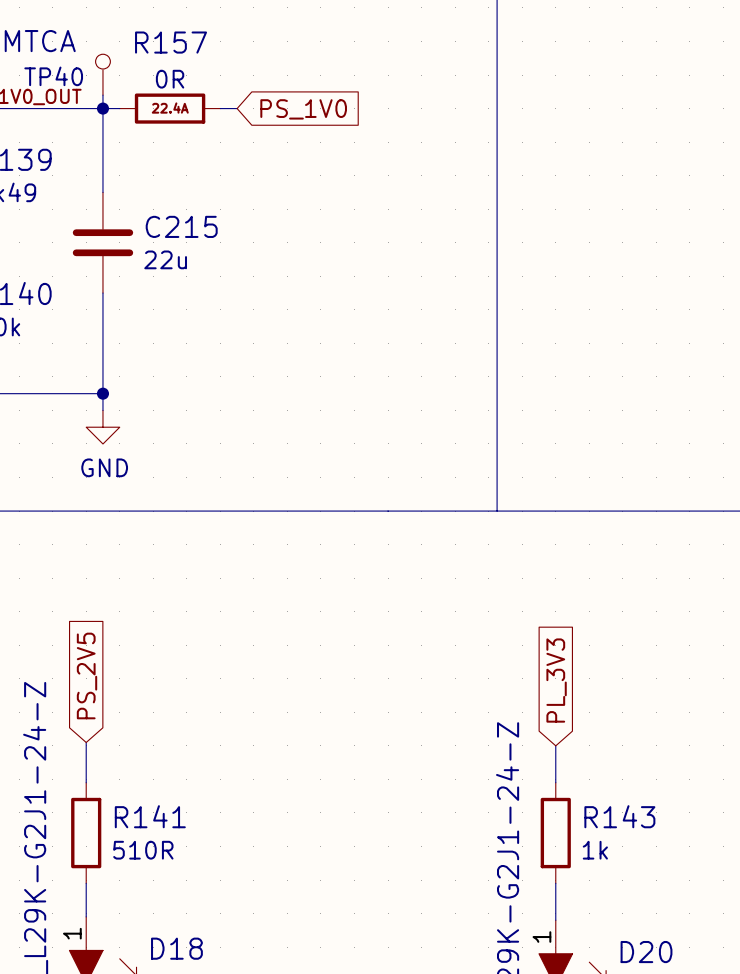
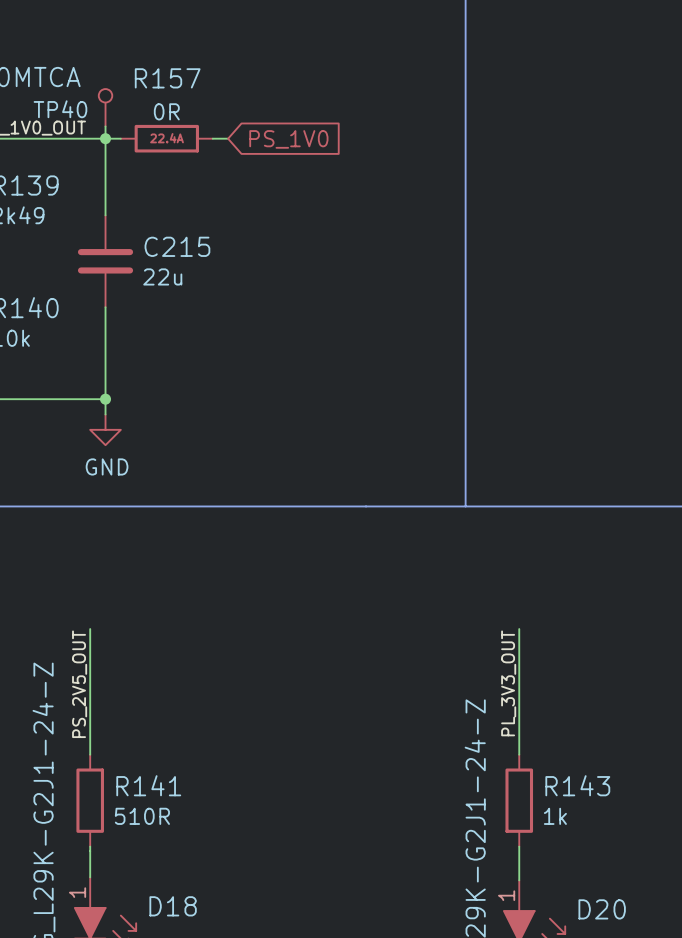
wire: none -> (90, 629) (90, 717)
wire: none -> (519, 629) (519, 720)
global label: PS_2V5 (87, 675) -> none
global label: PL_3V3 (556, 680) -> none
label: none -> PL_3V3_OUT (508, 683)
label: none -> PS_2V5_OUT (79, 684)

